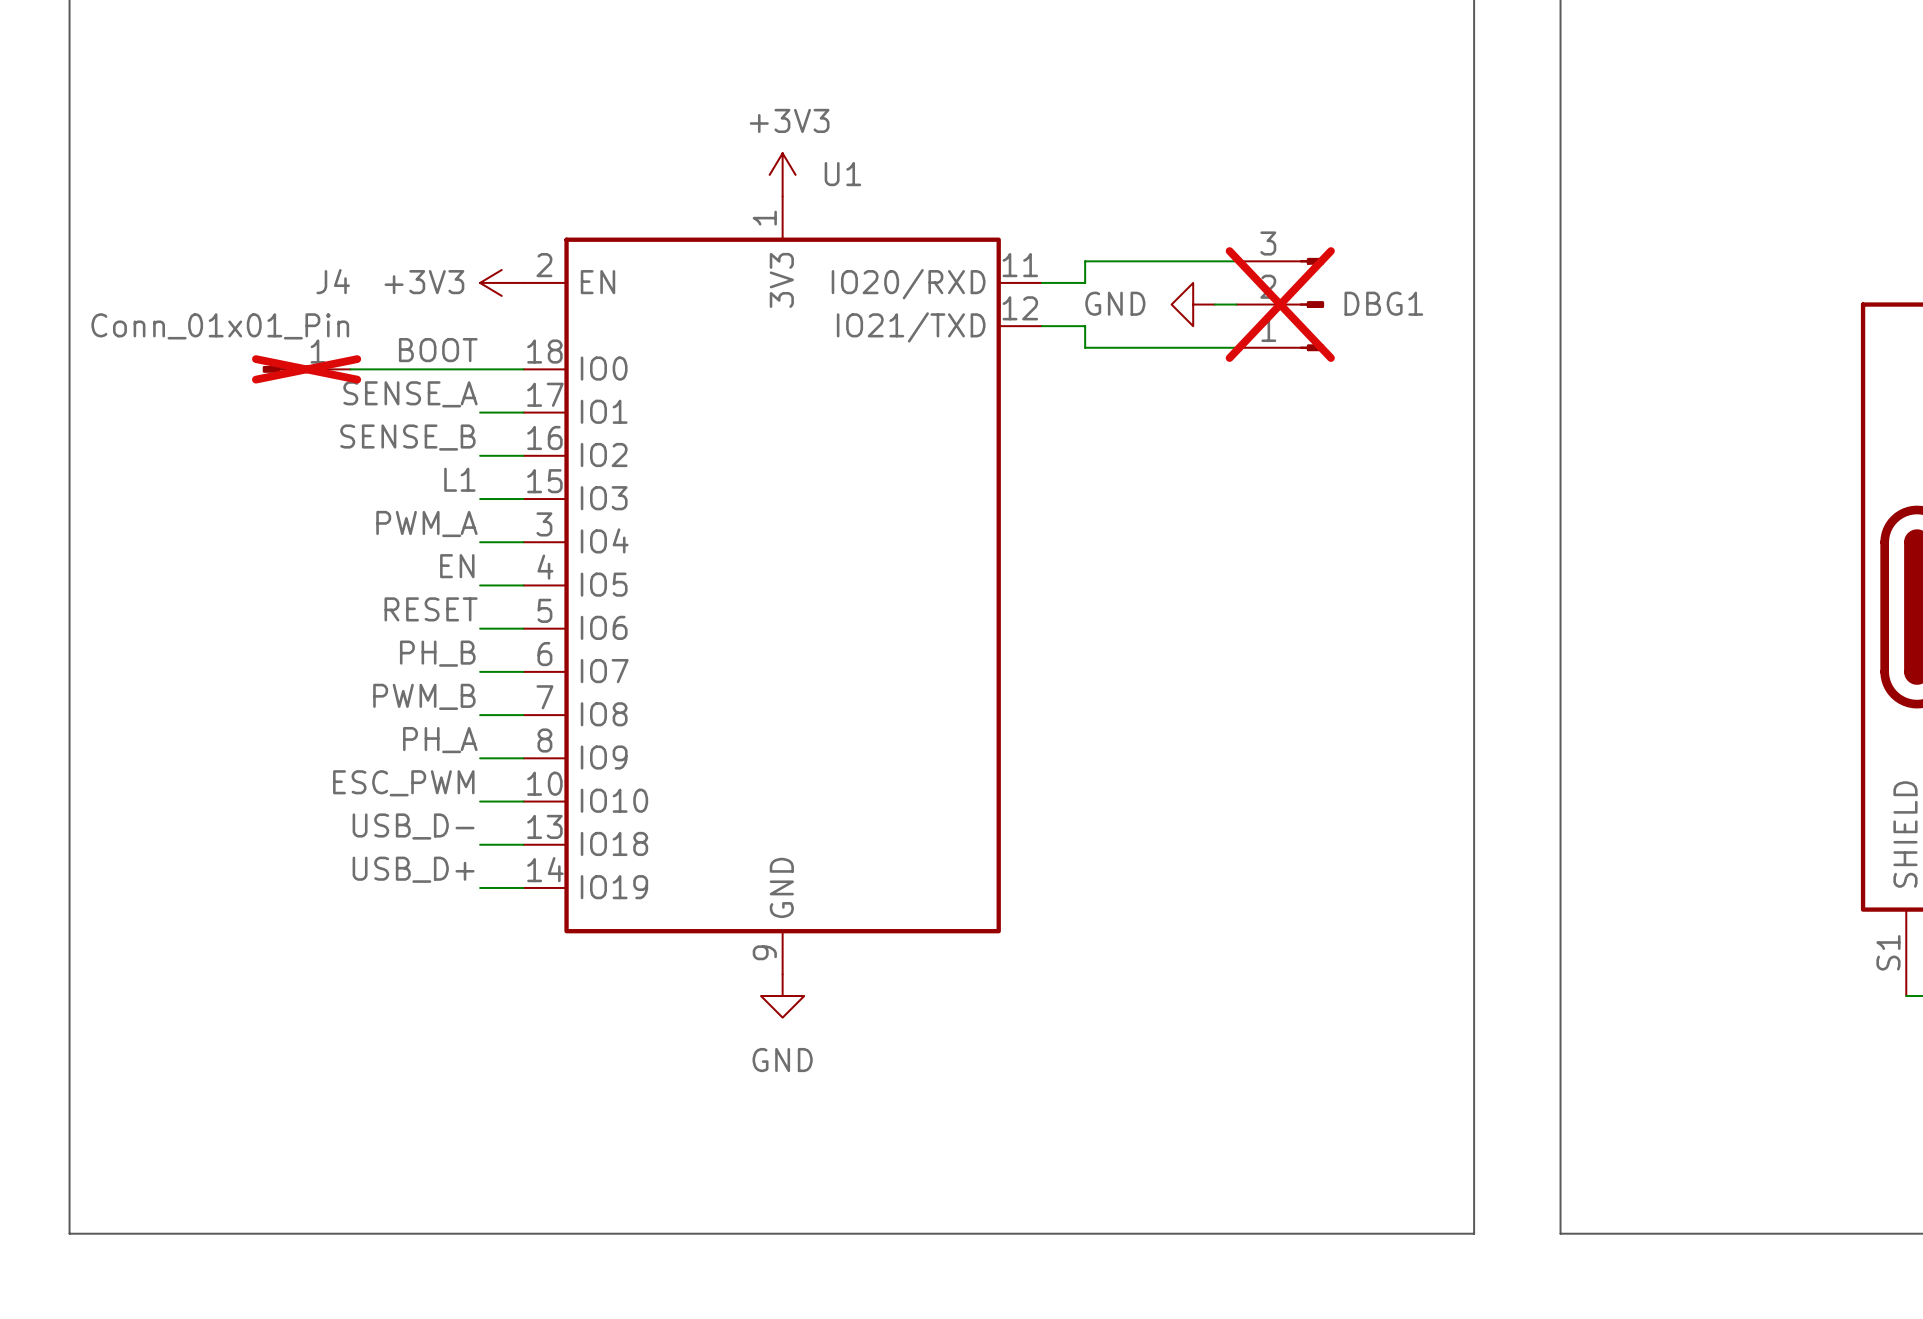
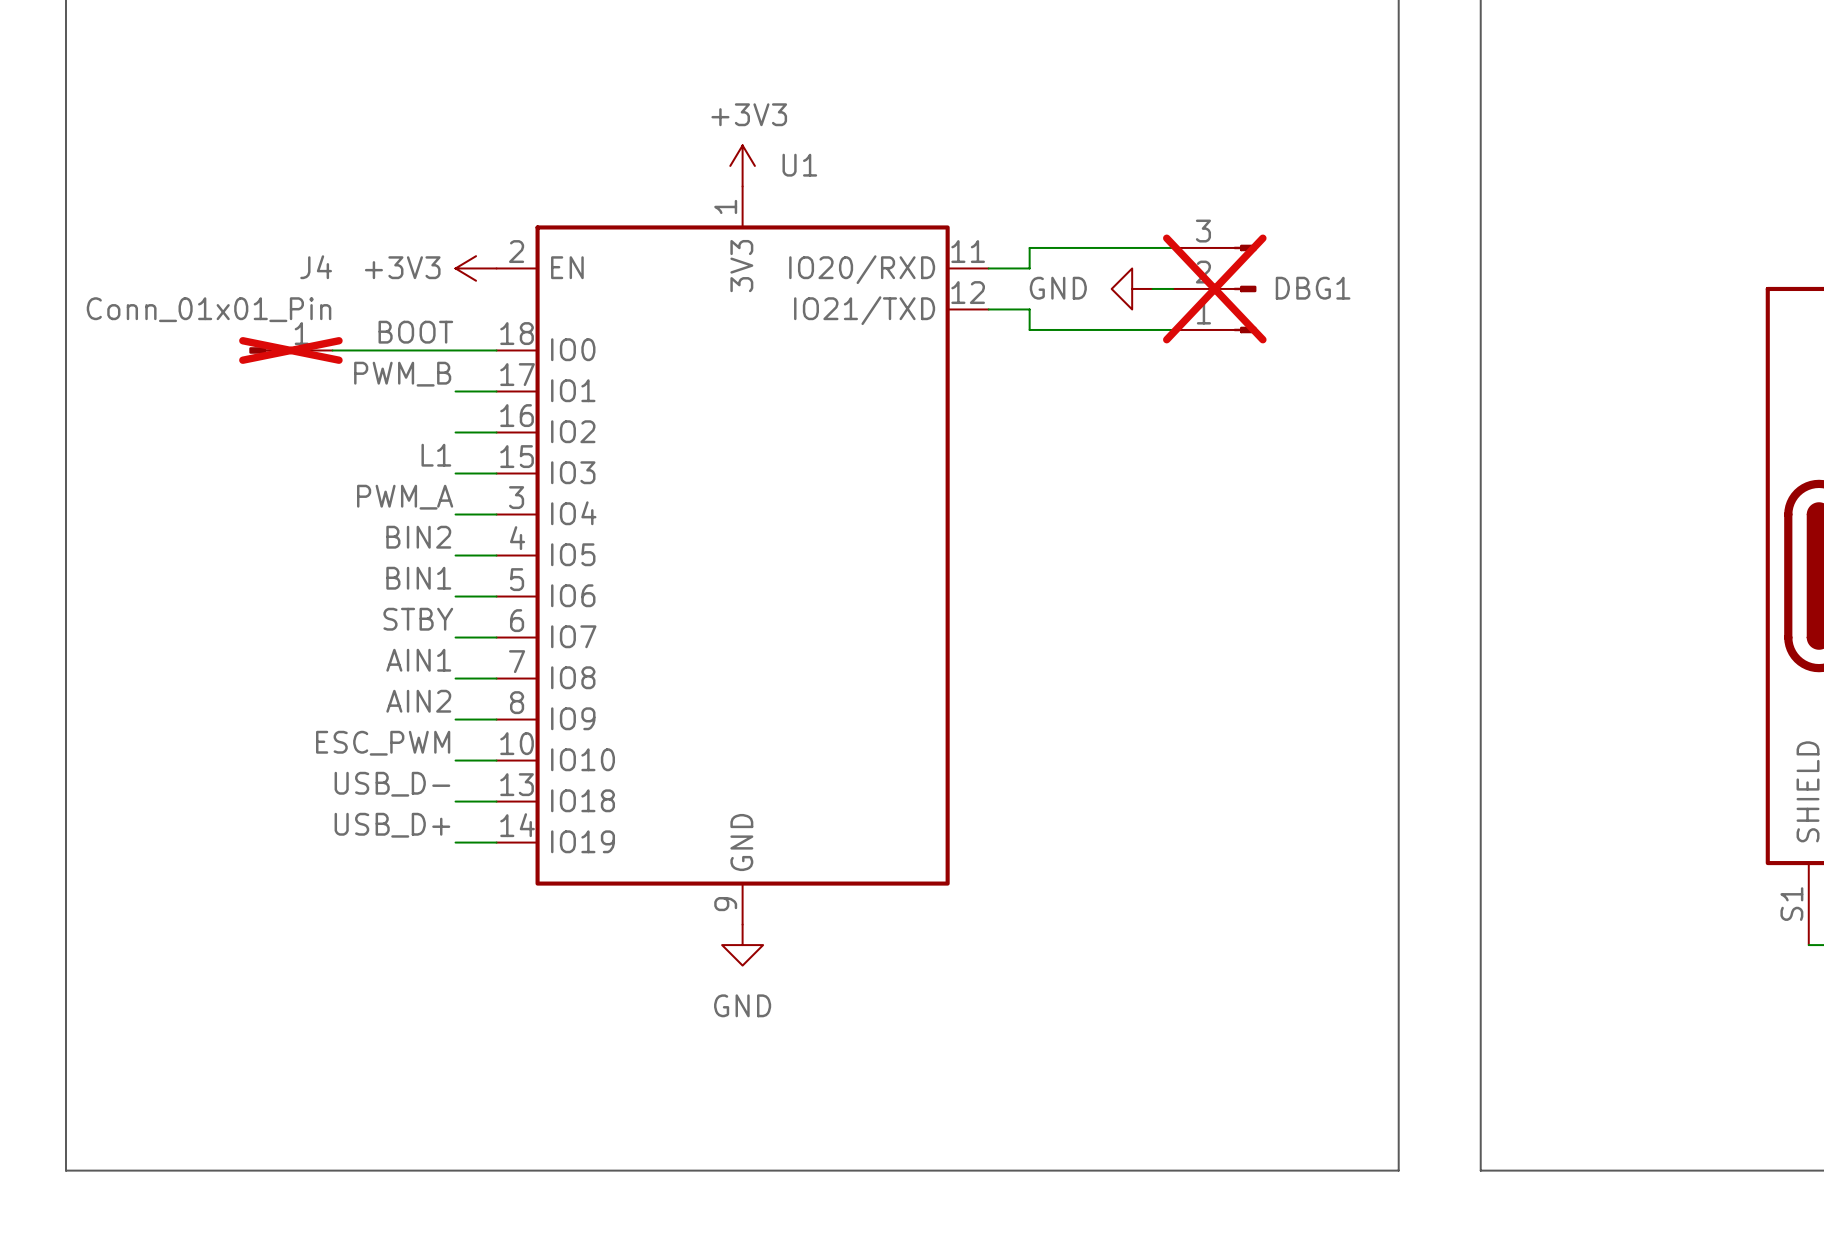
label: SENSE_A (410, 394) -> PWM_B (402, 374)
label: SENSE_B (407, 437) -> none
label: EN (457, 566) -> BIN2 (418, 537)
label: RESET (431, 609) -> BIN1 (418, 578)
label: PH_B (437, 653) -> STBY (418, 619)
label: PWM_B (424, 696) -> AIN1 (418, 660)
label: PH_A (440, 740) -> AIN2 (418, 701)

